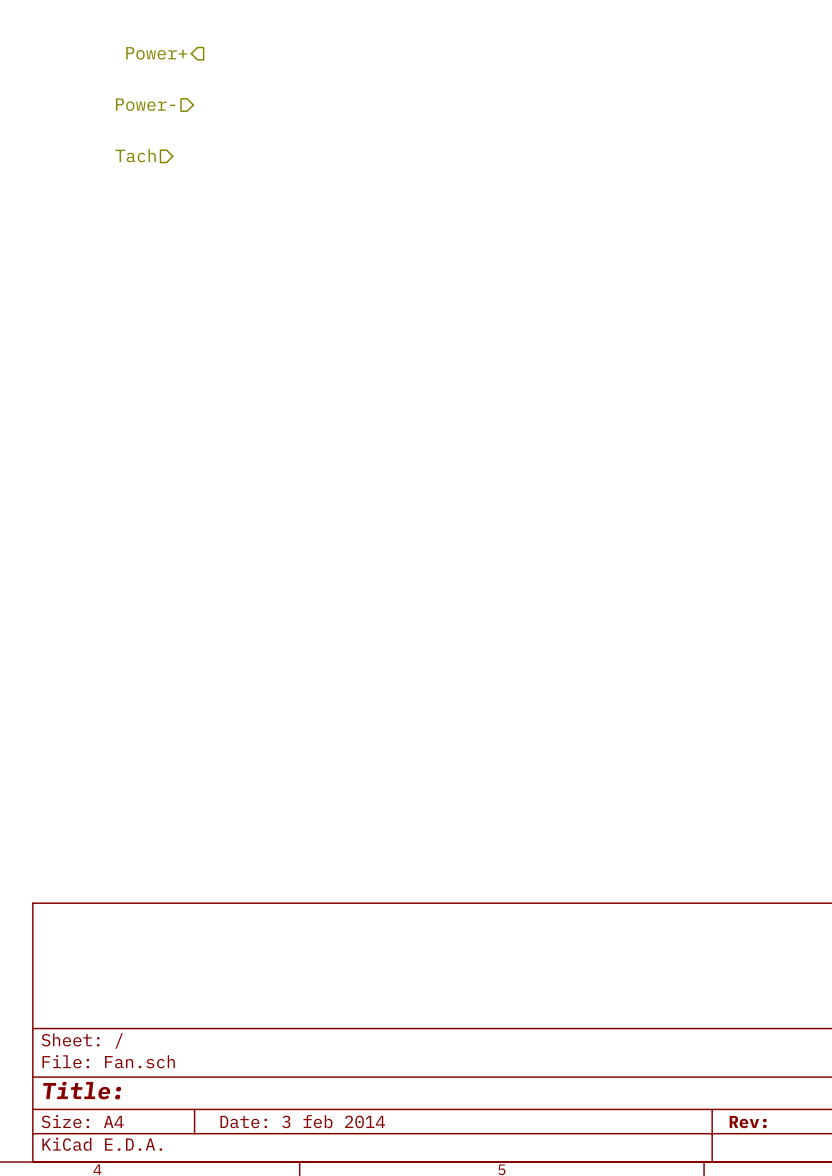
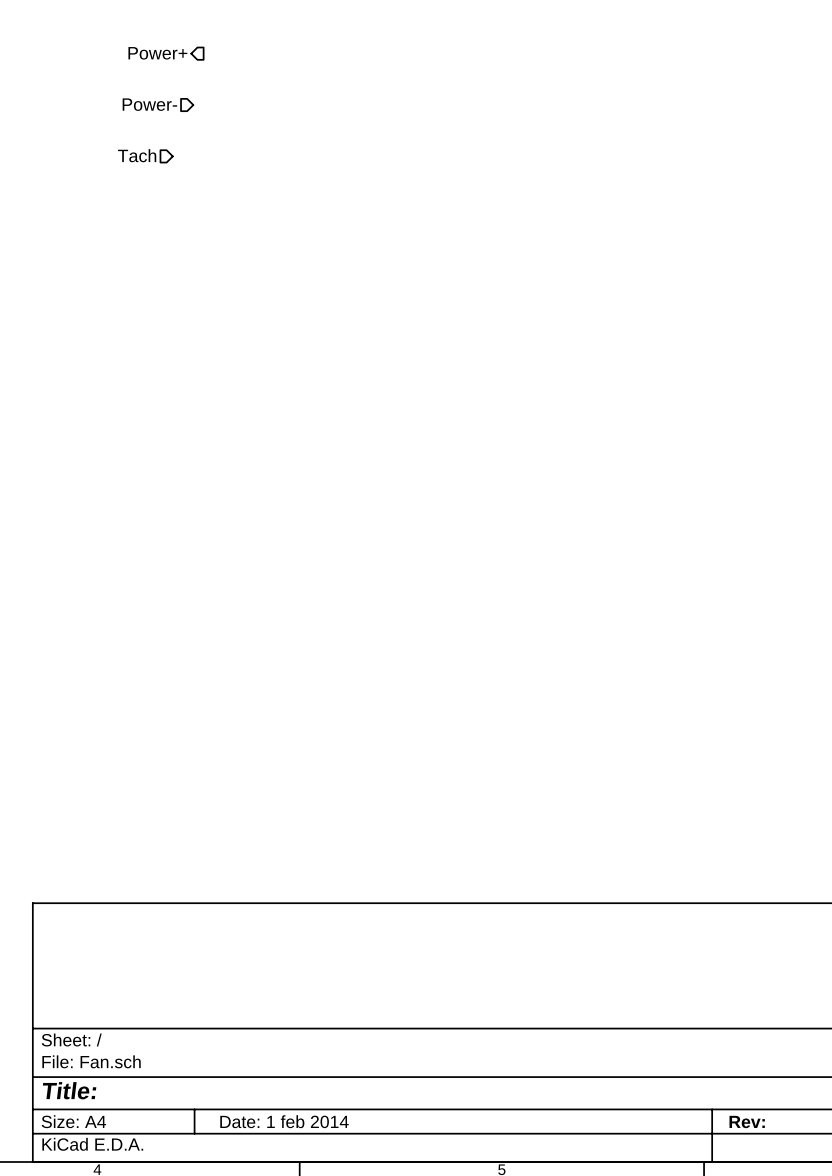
title block: Date: 3 feb 2014 (302, 1121) -> Date: 1 feb 2014 (284, 1121)

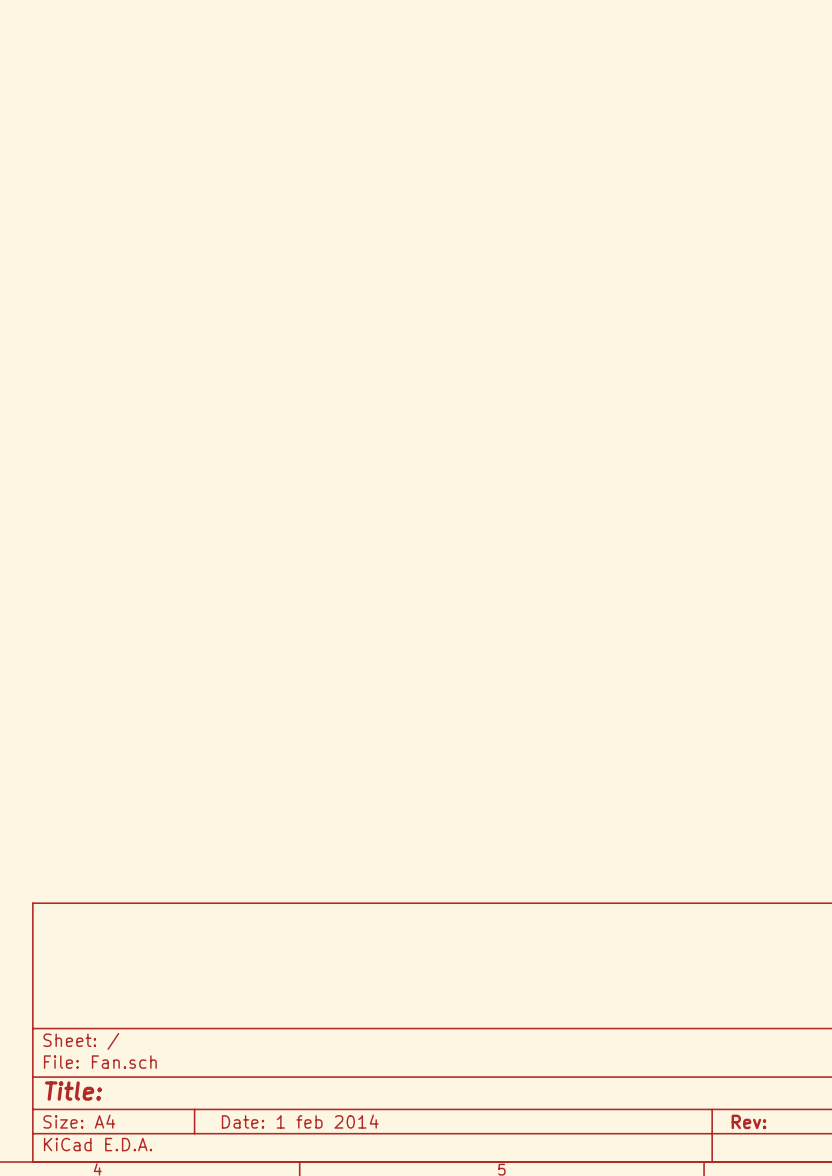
hierarchical label: Power+ (157, 53) -> none
hierarchical label: Power- (149, 104) -> none
hierarchical label: Tach (137, 155) -> none

